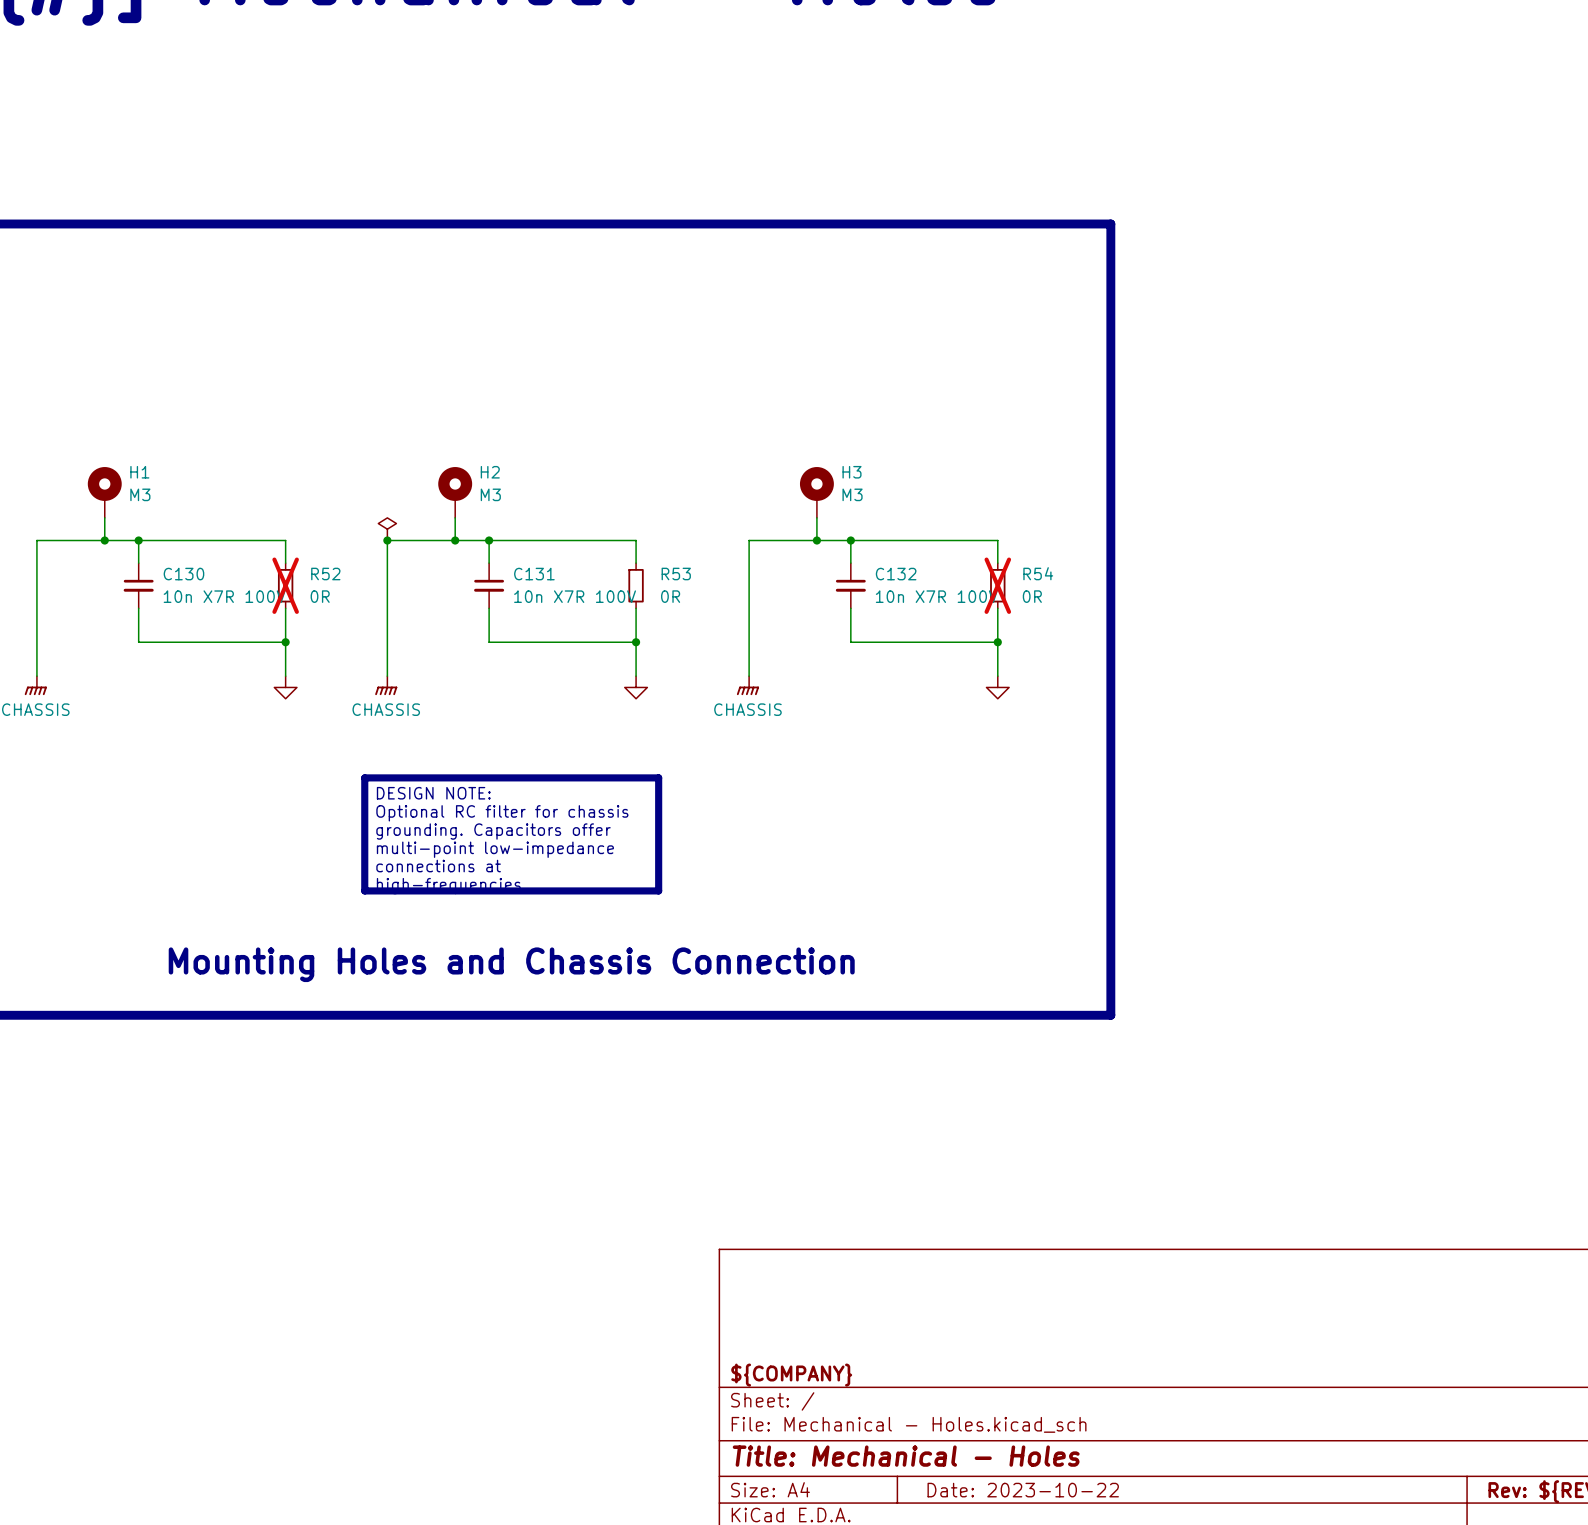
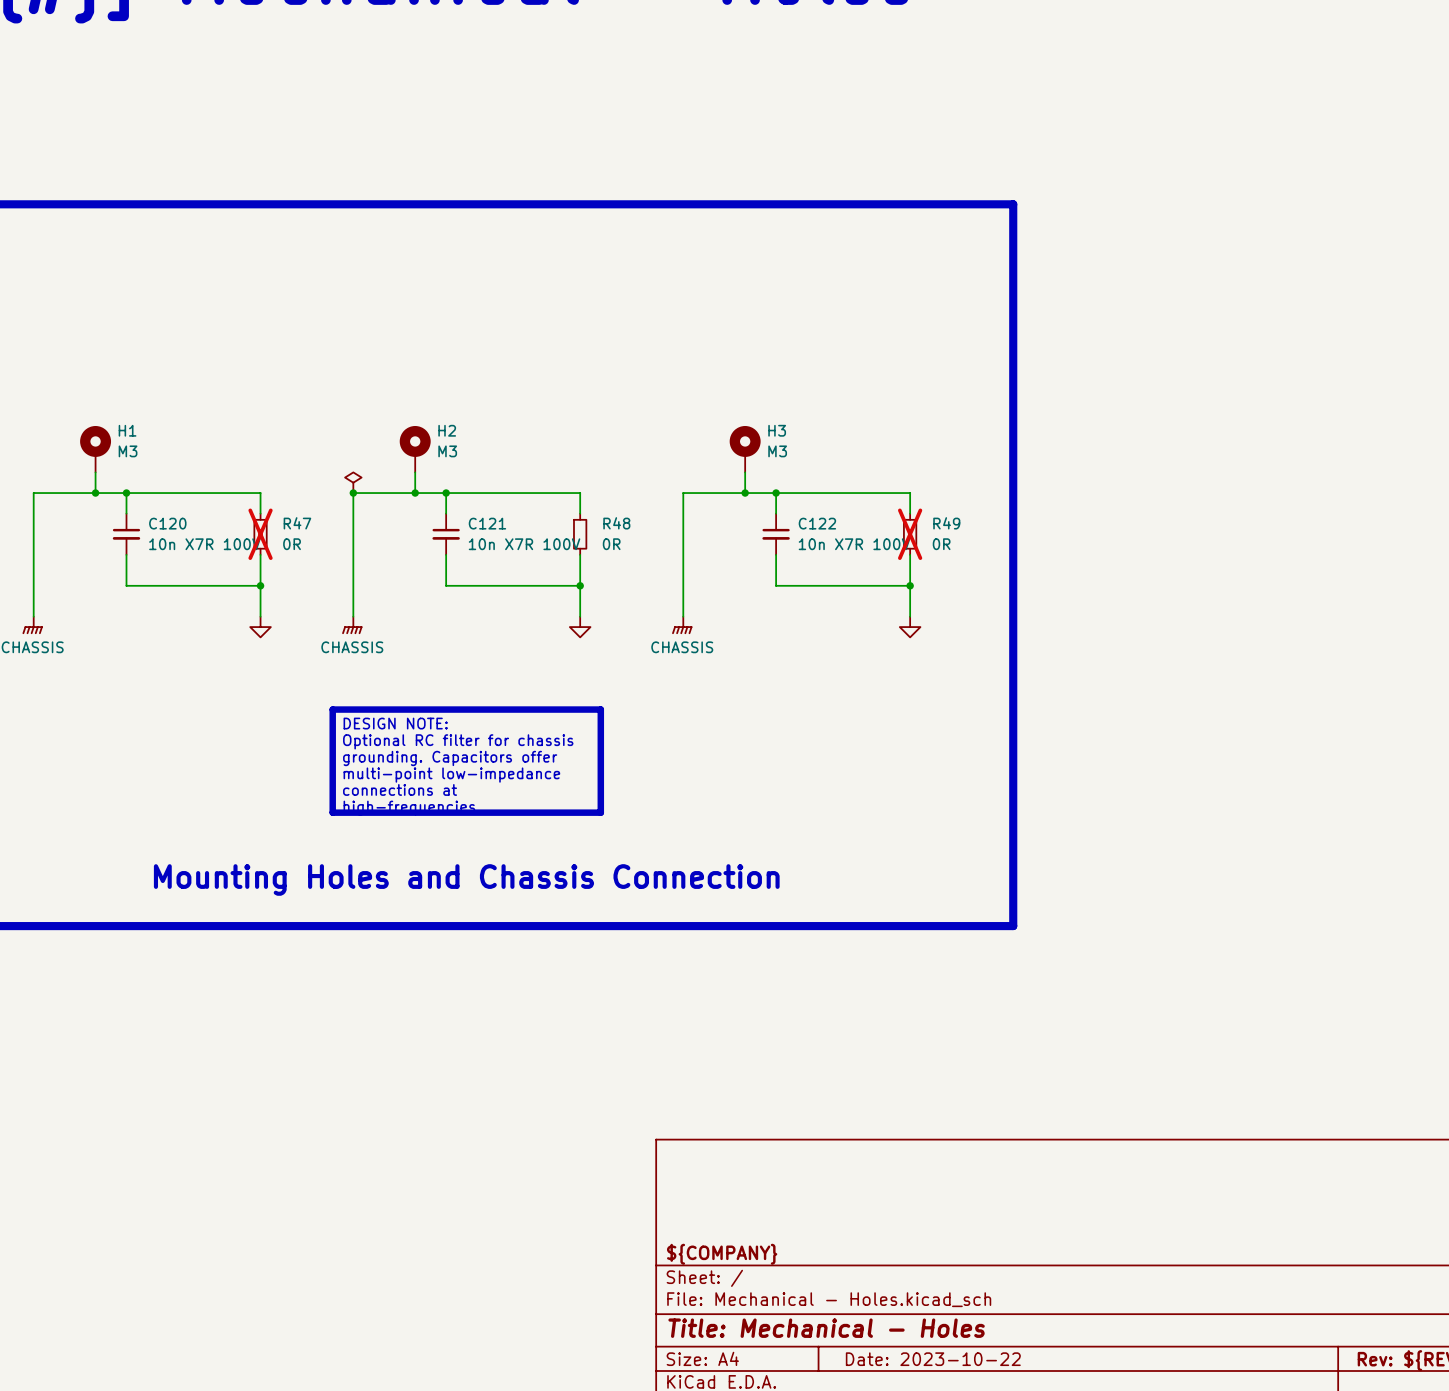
R54 name: R54 (1038, 573) -> R49 (946, 523)
C130 name: C130 (183, 574) -> C120 (167, 523)
R52 name: R52 (325, 574) -> R47 (297, 523)
C131 name: C131 (534, 574) -> C121 (487, 523)
R53 name: R53 (676, 574) -> R48 (616, 523)
C132 name: C132 (896, 574) -> C122 (817, 523)

